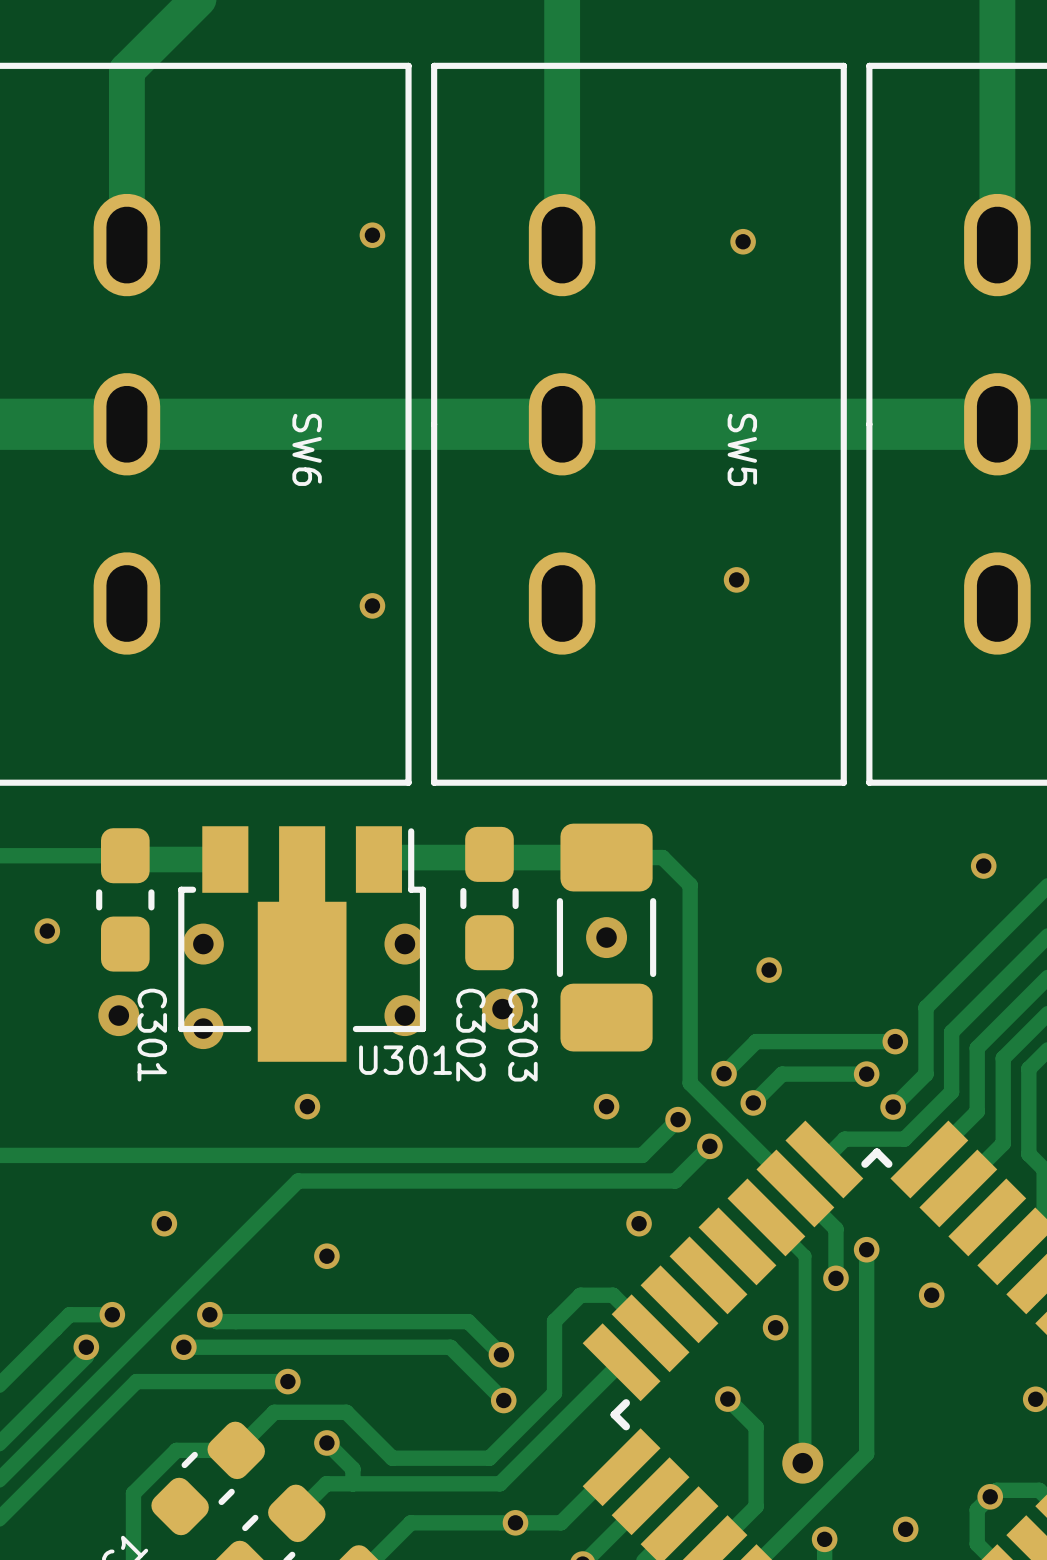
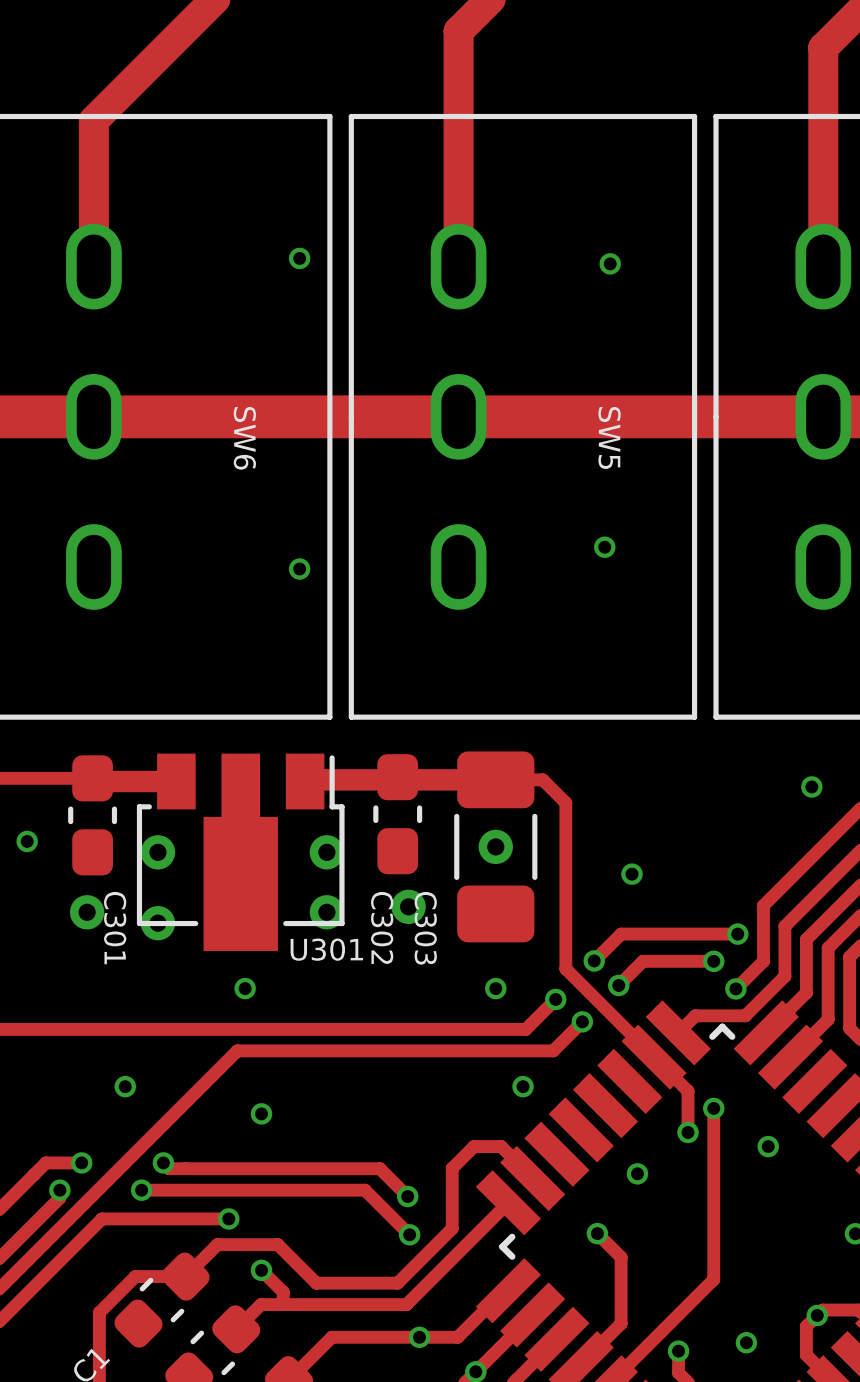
track: (766, 1217) (805, 1256) (805, 1460) (802, 1463) -> none
via: (802, 1463) -> none

